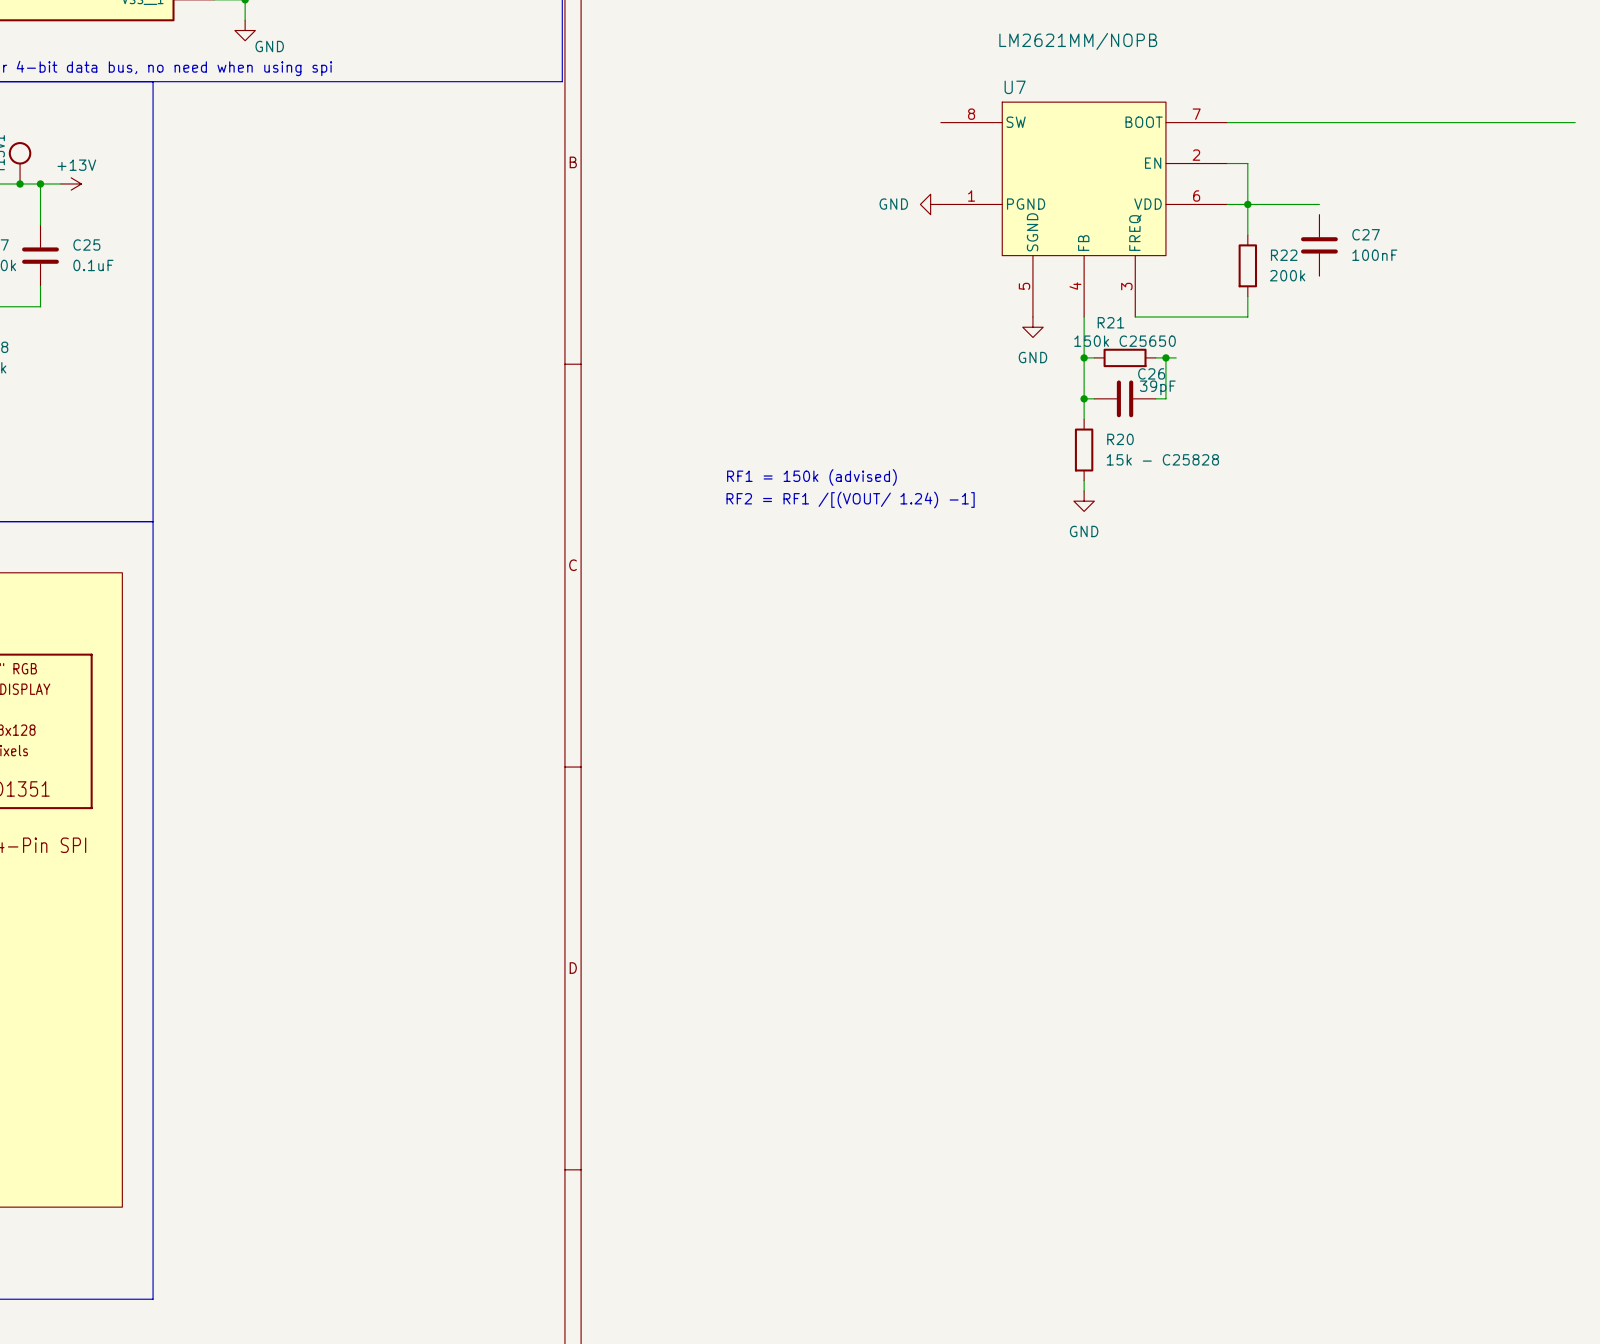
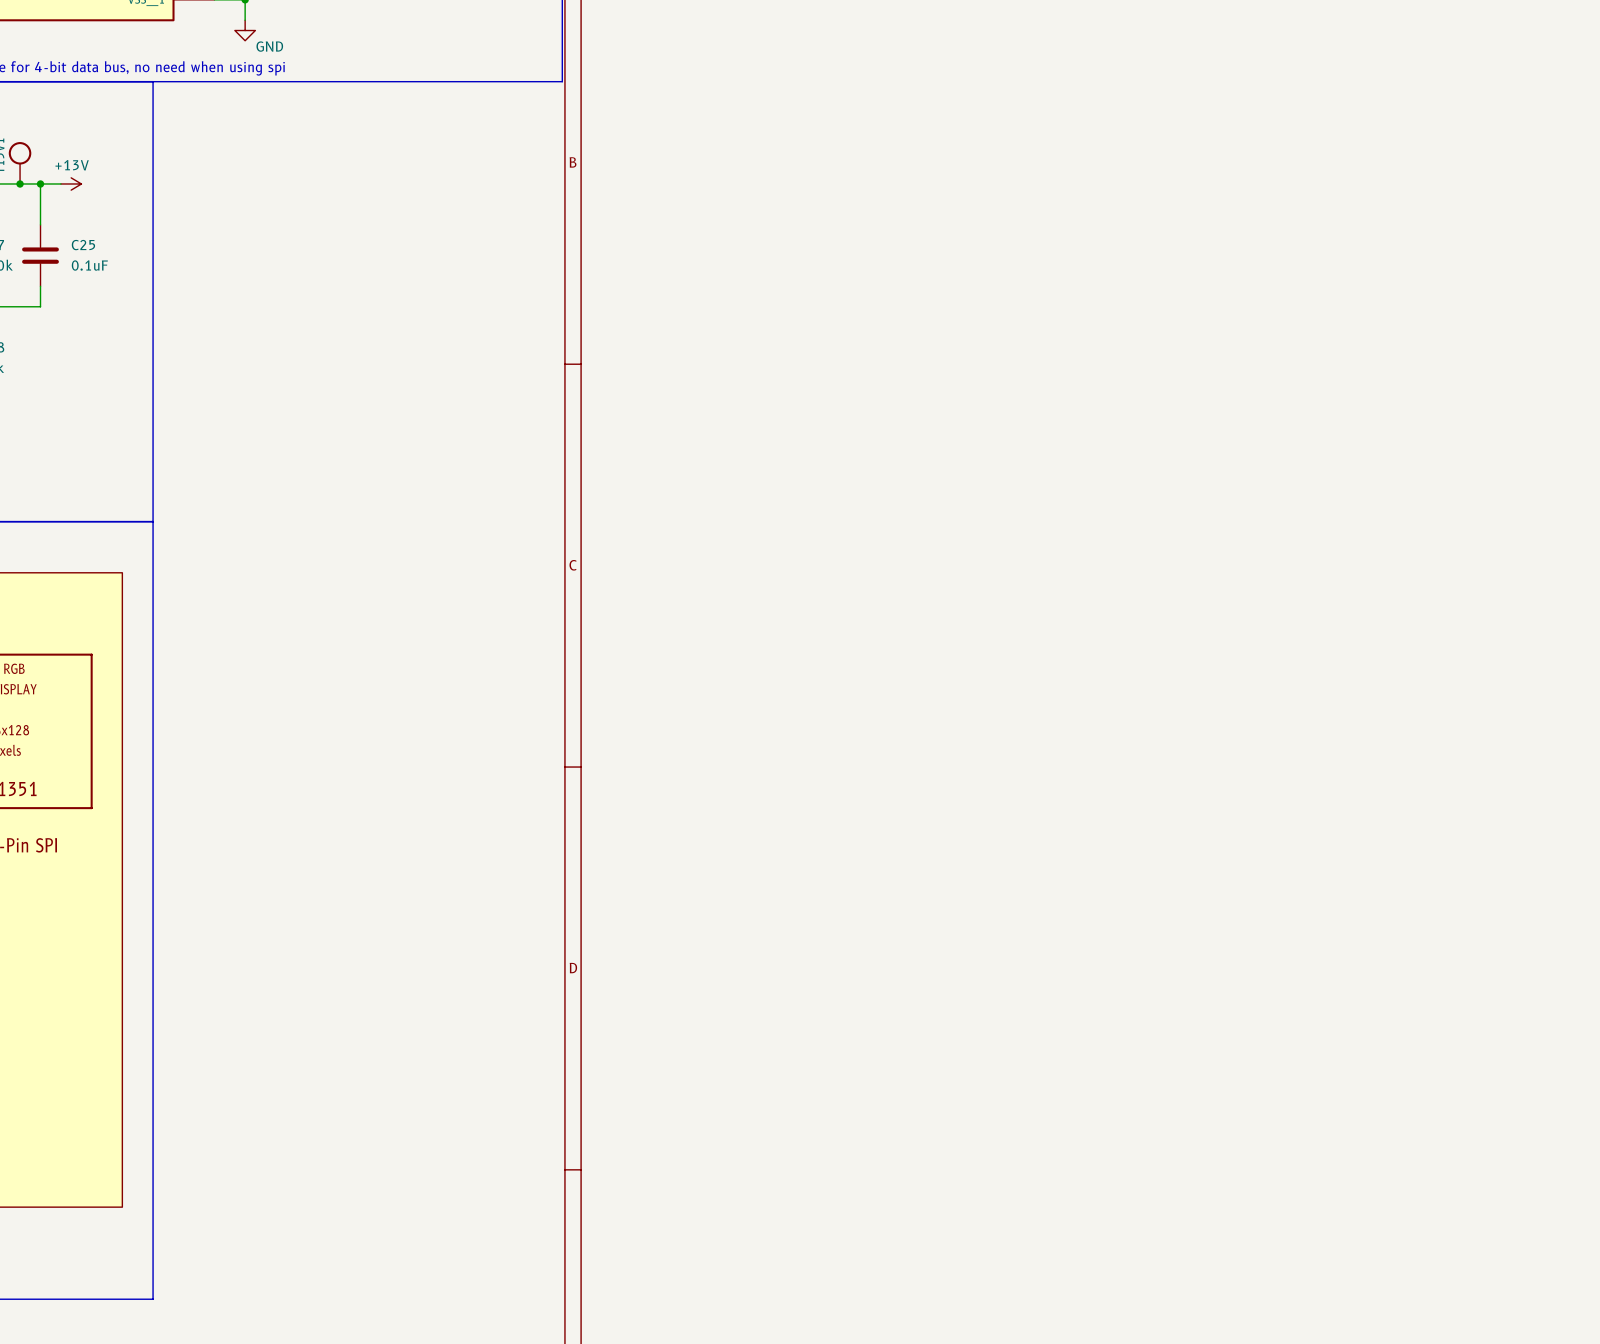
wire: (1227, 122) (1575, 122) -> none
wire: (1227, 163) (1247, 163) (1247, 235) -> none
power symbol: GND (930, 204) -> none
wire: (1227, 204) (1319, 204) -> none
junction: (1247, 204) -> none
U7: LM2621MM/NOPB (1084, 209) -> none
C27: 100nF (1319, 245) -> none
R22: 200k (1247, 265) -> none
wire: (1247, 296) (1247, 317) (1135, 317) -> none
wire: (1084, 317) (1084, 419) -> none
power symbol: GND (1032, 327) -> none
wire: (1084, 357) (1094, 357) -> none
junction: (1084, 357) -> none
R21: 150k C25650 (1125, 357) -> none
wire: (1155, 357) (1176, 357) -> none
wire: (1165, 357) (1165, 398) (1155, 398) -> none
junction: (1165, 357) -> none
wire: (1084, 398) (1094, 398) -> none
junction: (1084, 398) -> none
C26: 39pF (1125, 398) -> none
R20: 15k - C25828 (1084, 450) -> none
text: RF1 = 150k (advised) (811, 477) -> none
wire: (1084, 480) (1084, 490) -> none
text: RF2 = RF1 /[(VOUT/ 1.24) −1] (850, 499) -> none
power symbol: GND (1084, 501) -> none

